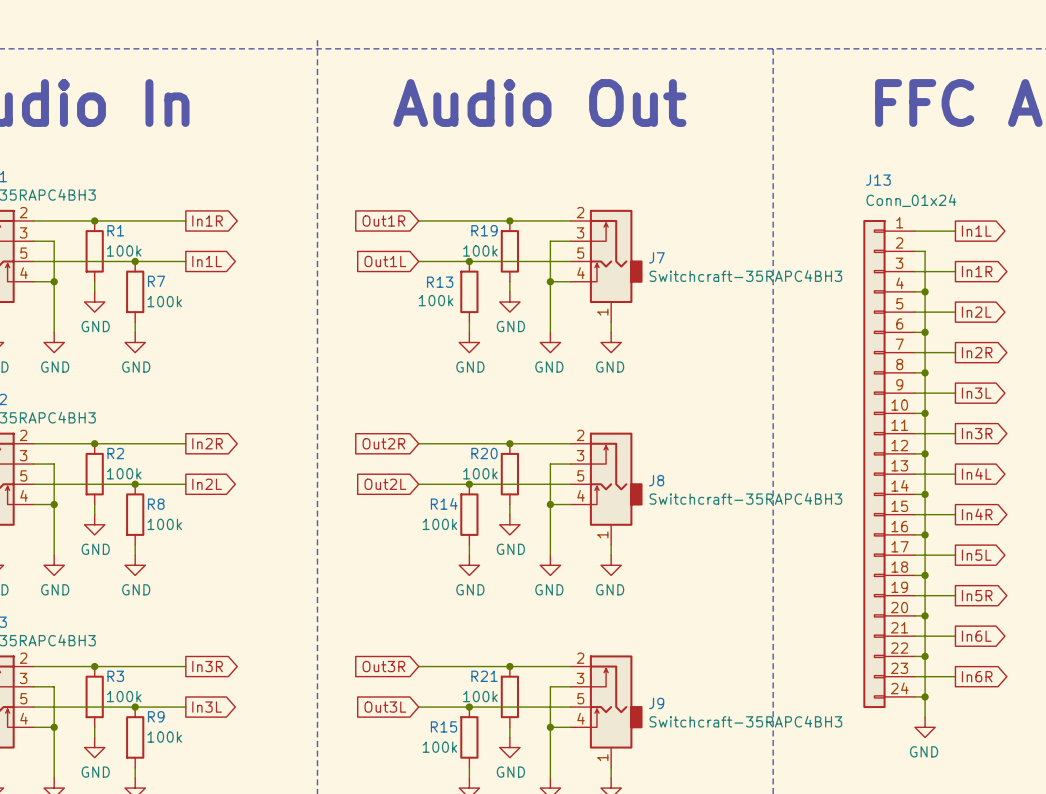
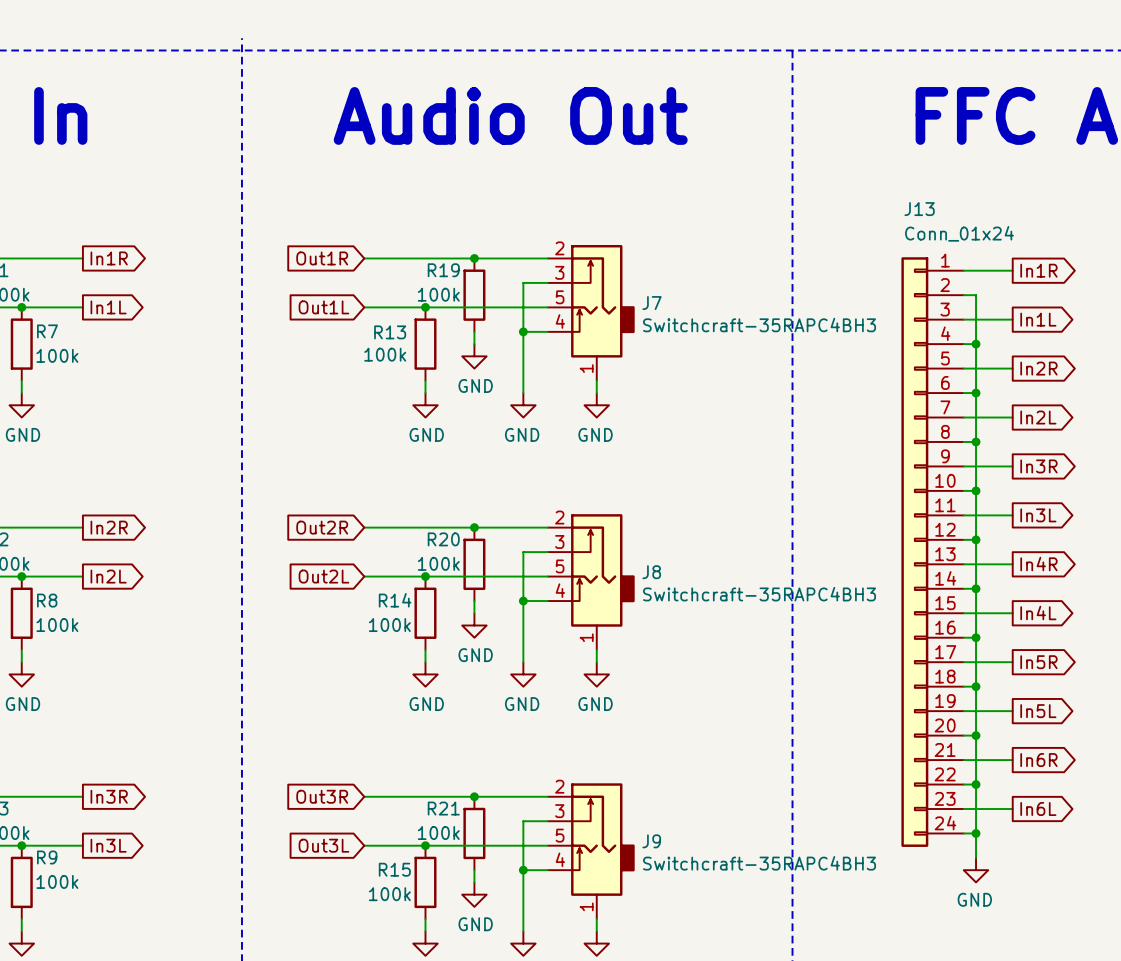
global label: In1L (976, 231) -> In1R (1038, 270)
global label: In1R (977, 271) -> In1L (1038, 319)
global label: In2L (976, 312) -> In2R (1038, 368)
global label: In2R (977, 352) -> In2L (1038, 417)
global label: In3L (976, 393) -> In3R (1038, 466)
global label: In3R (977, 433) -> In3L (1038, 515)
global label: In4L (976, 473) -> In4R (1038, 564)
global label: In4R (977, 514) -> In4L (1038, 612)
global label: In5L (976, 555) -> In5R (1038, 662)
global label: In5R (977, 595) -> In5L (1038, 711)
global label: In6L (976, 636) -> In6R (1038, 760)
global label: In6R (977, 676) -> In6L (1038, 809)

